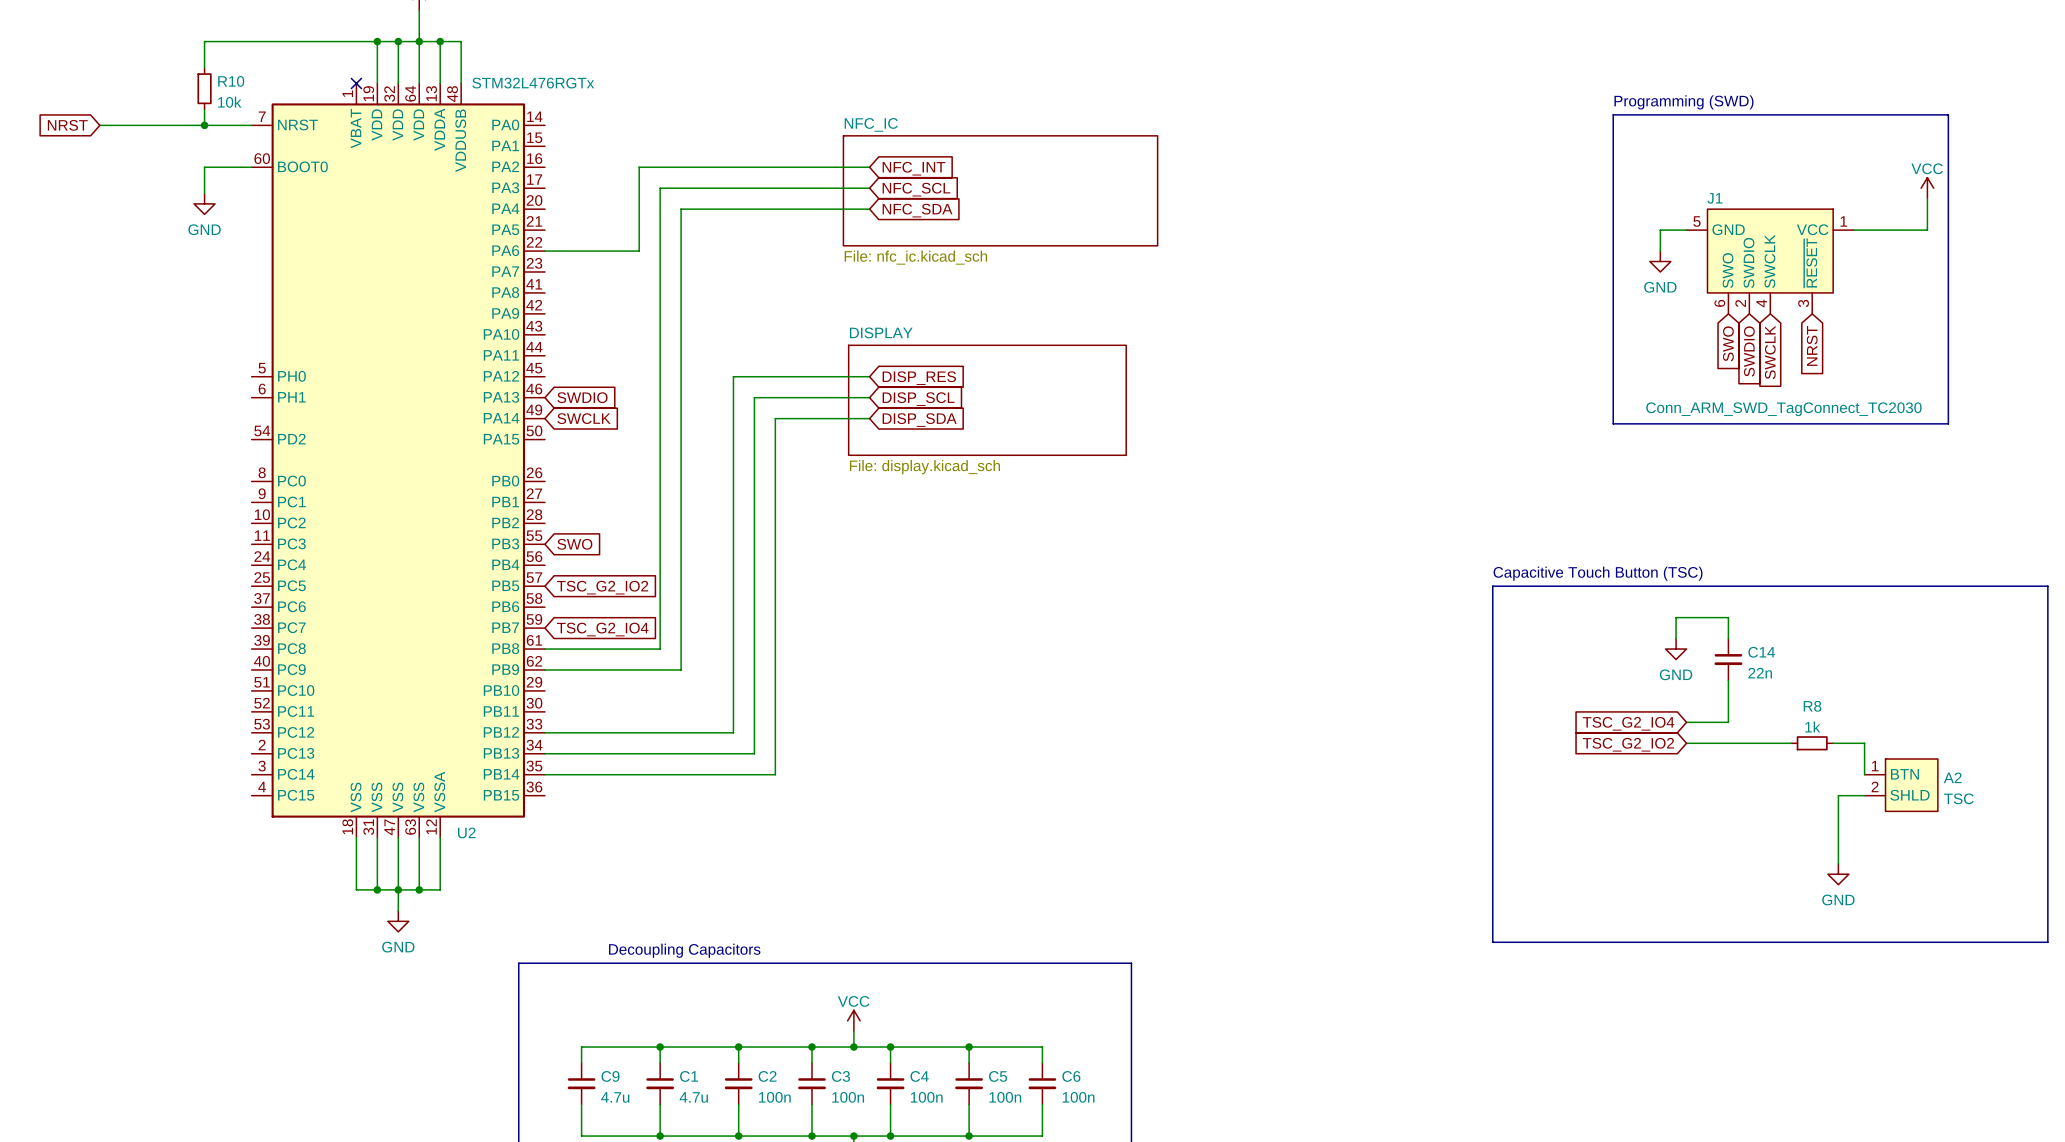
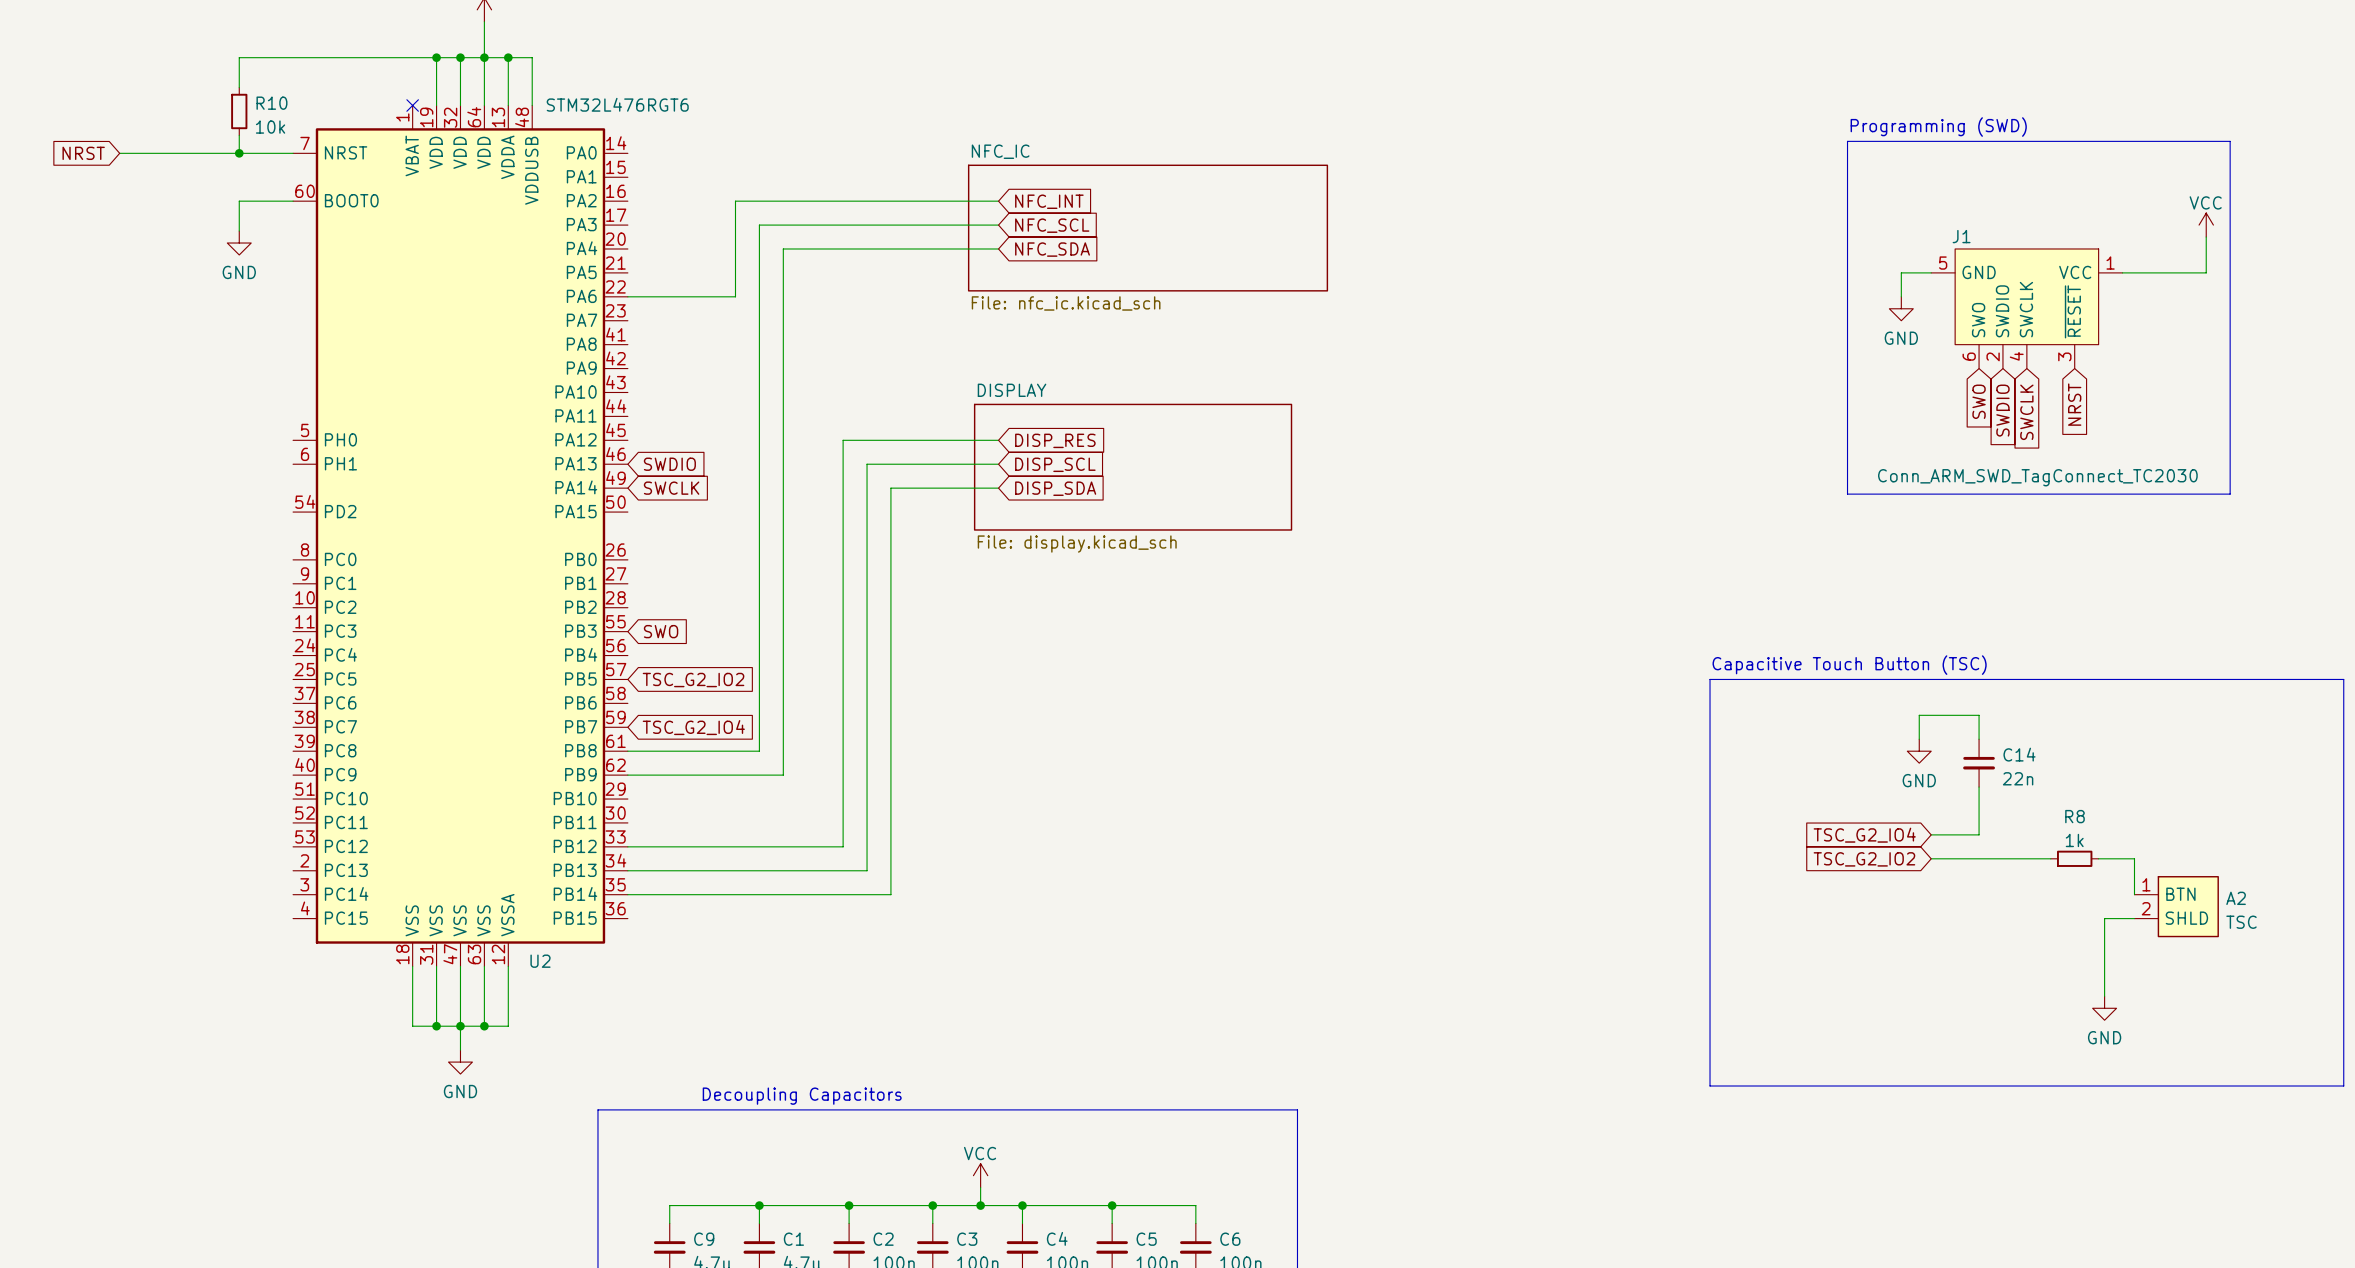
U2 value: STM32L476RGTx (533, 83) -> STM32L476RGT6 (617, 104)

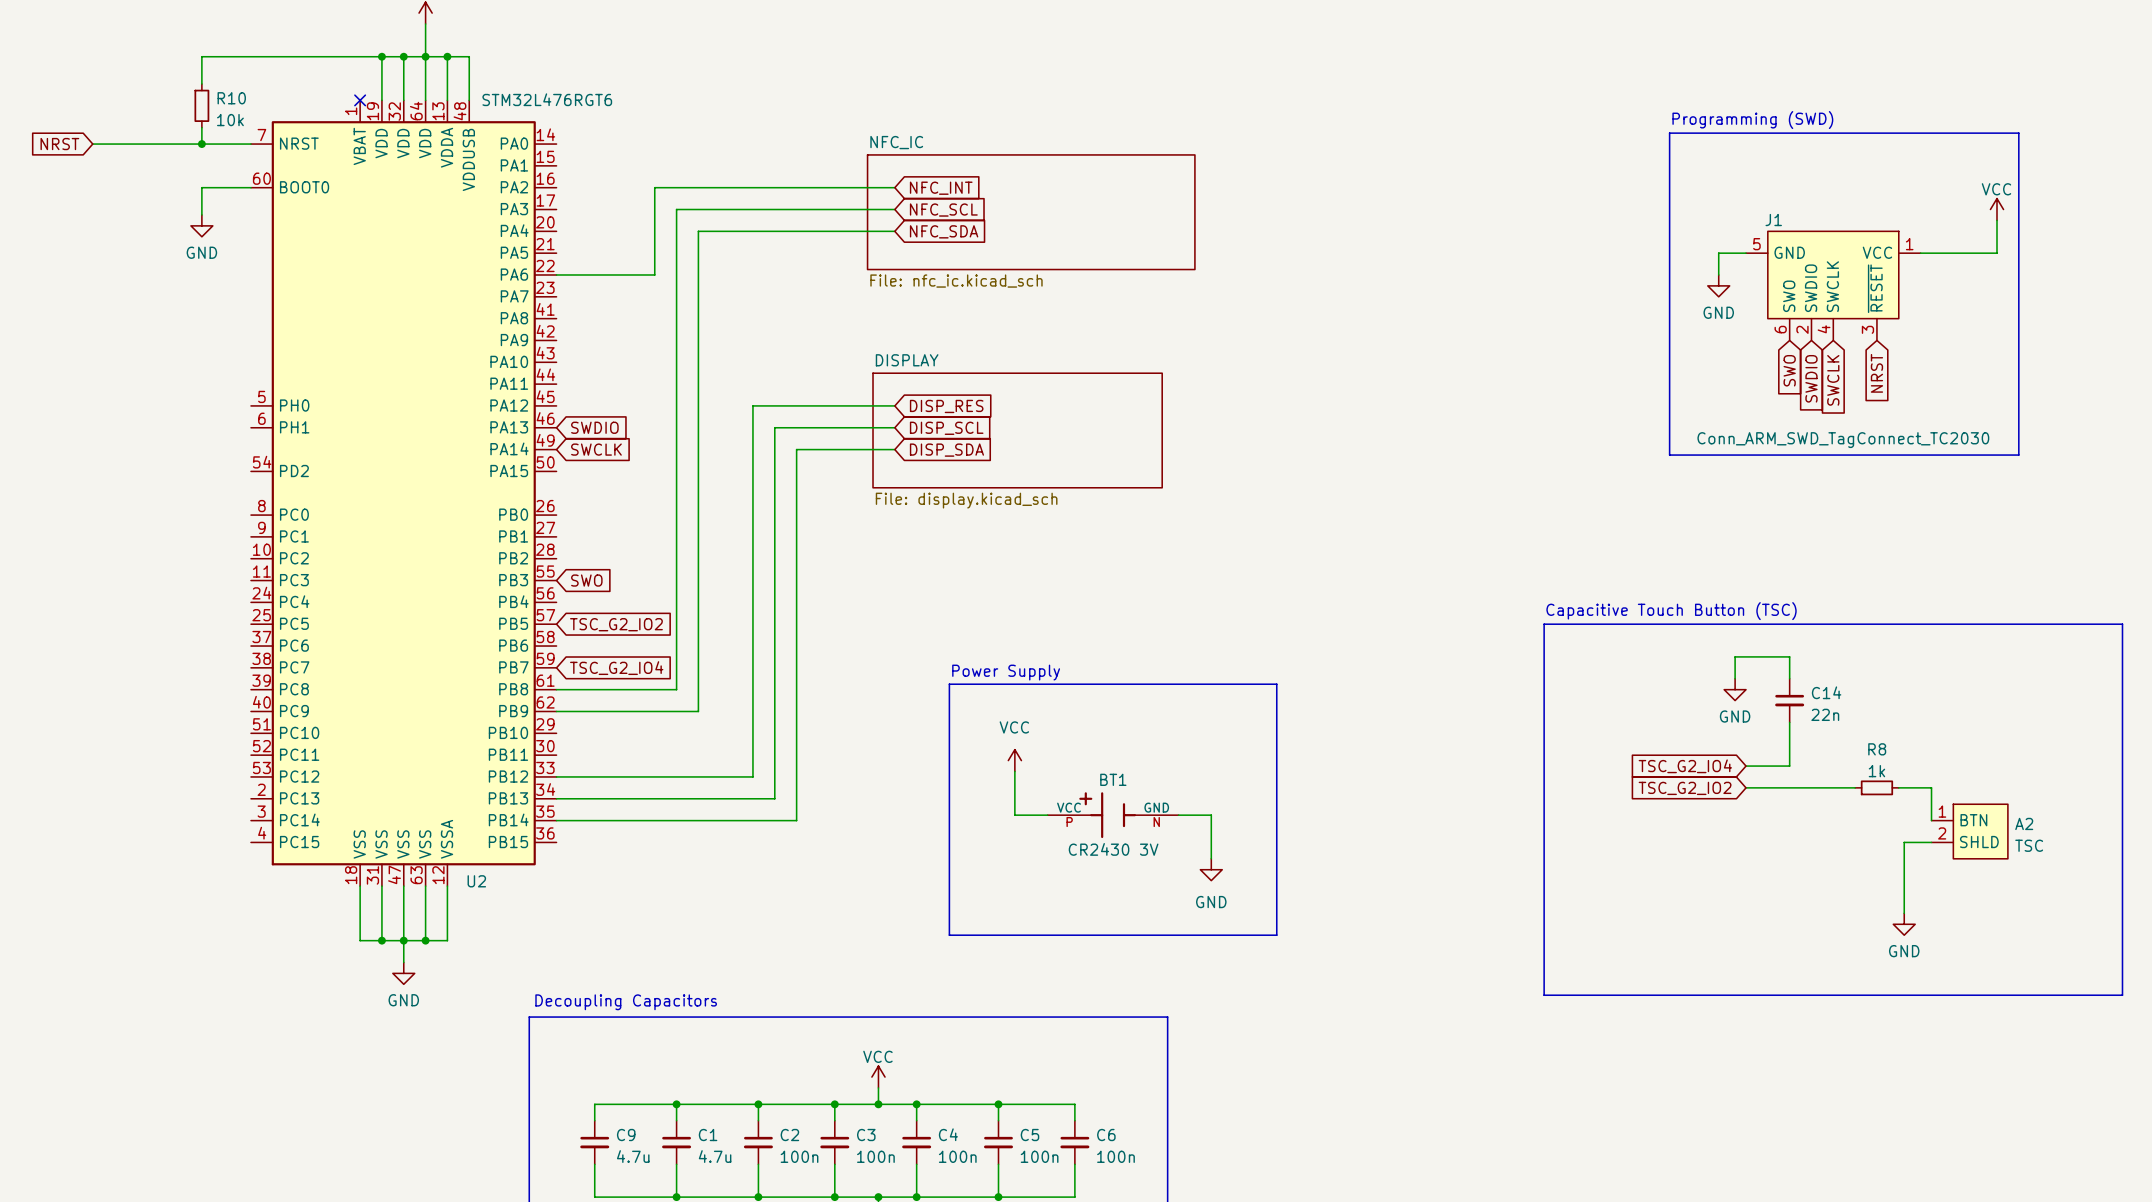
text: none -> Power Supply (1006, 672)
line: none -> (949, 684) (1276, 684) (1276, 935) (949, 935) (949, 684)
power symbol: none -> VCC (1014, 760)
wire: none -> (1014, 771) (1014, 815) (1047, 815)
BT1: none -> CR2430 3V (1113, 815)
wire: none -> (1178, 815) (1211, 815) (1211, 858)
power symbol: none -> GND (1211, 869)
text position: Decoupling Capacitors (802, 1096) -> Decoupling Capacitors (626, 1002)

